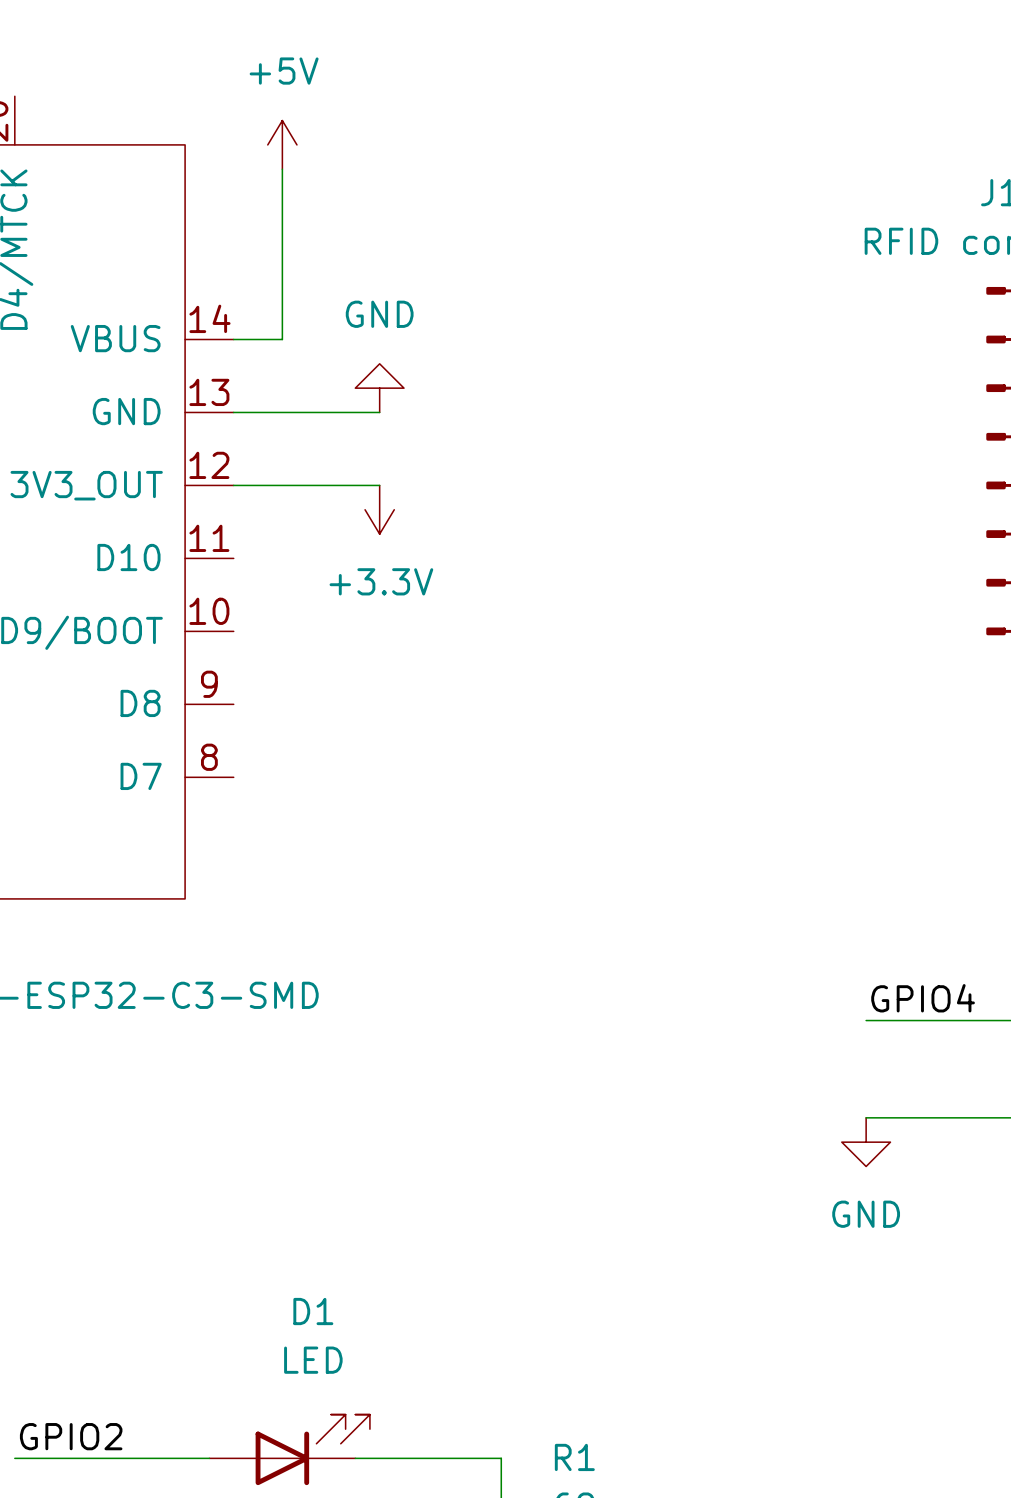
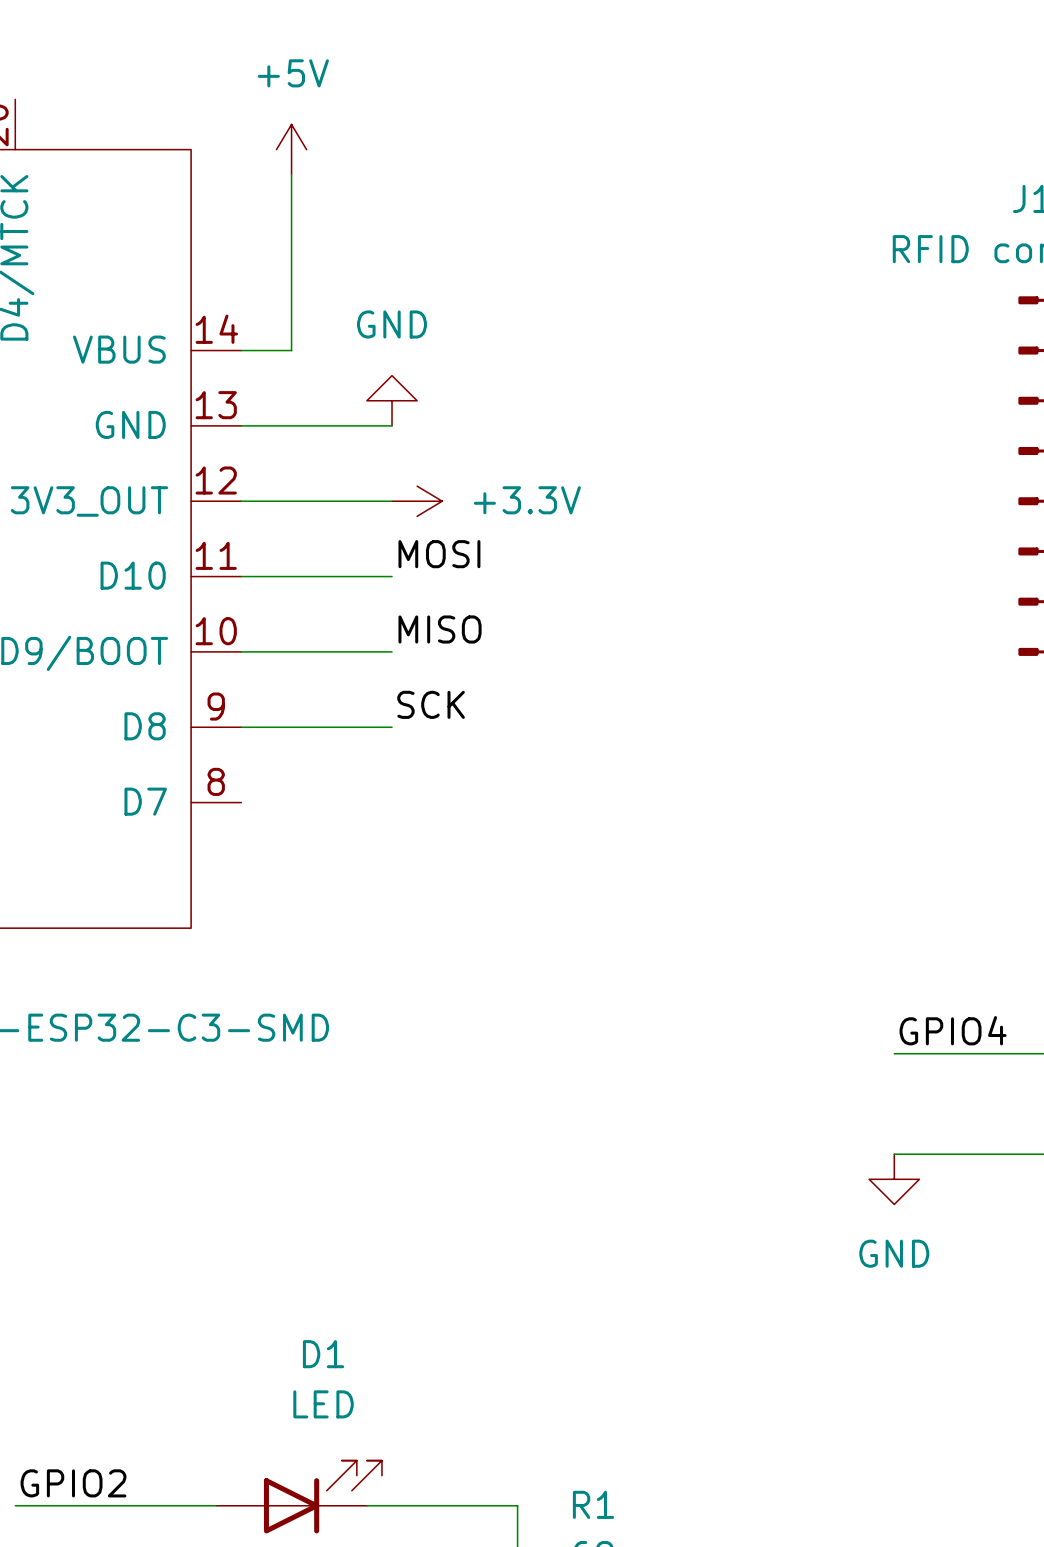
power symbol rotation: 0° (379, 509) -> 90° counterclockwise (417, 501)
power symbol position: +3.3V (379, 509) -> +3.3V (417, 501)
label: none -> MOSI (439, 554)
wire: none -> (241, 576) (392, 576)
power symbol text position: +3.3V (381, 581) -> +3.3V (527, 500)
label: none -> MISO (440, 629)
wire: none -> (241, 651) (392, 651)
label: none -> SCK (431, 704)
wire: none -> (241, 727) (392, 727)

